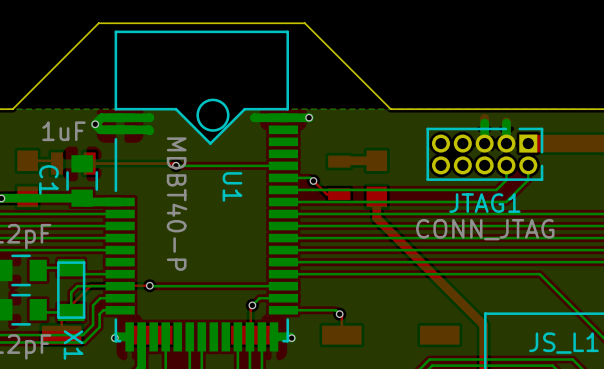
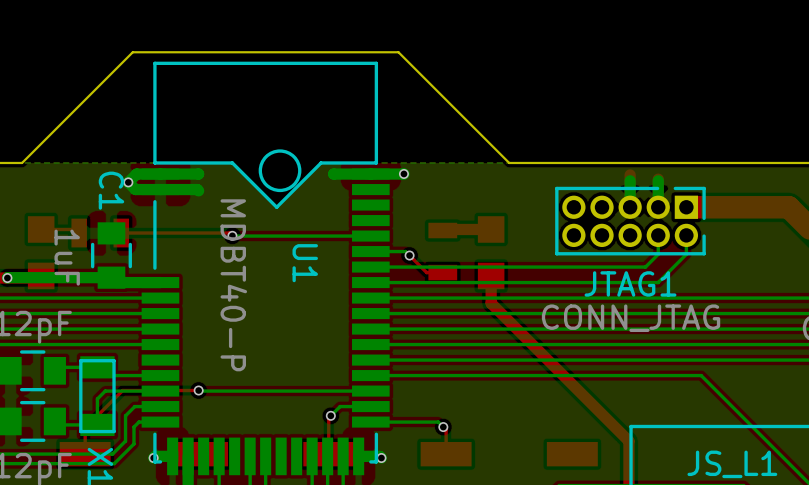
C1 value rotation: 0° (64, 131) -> 90° clockwise (67, 257)
C1 name position: C1 (48, 179) -> C1 (111, 190)

